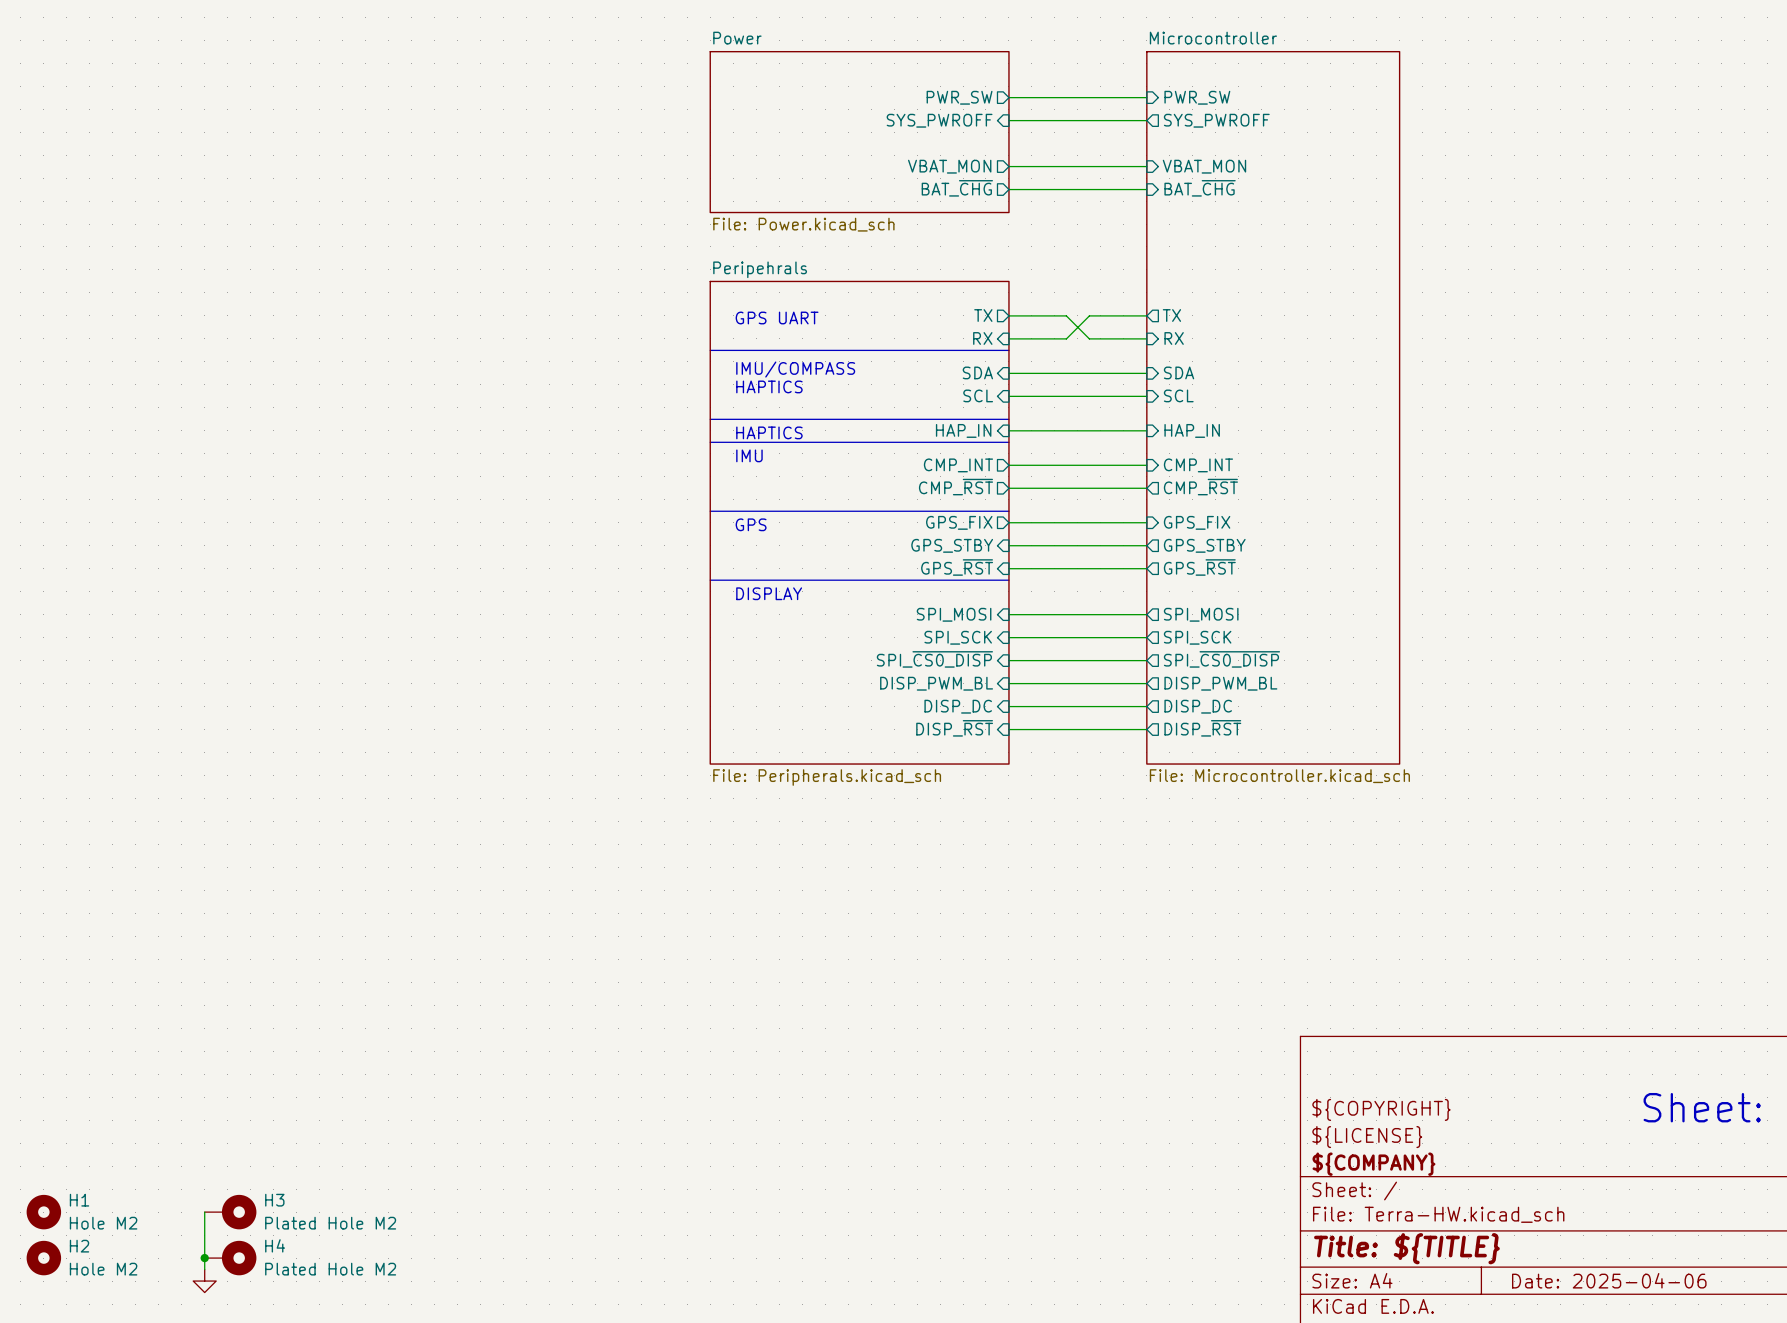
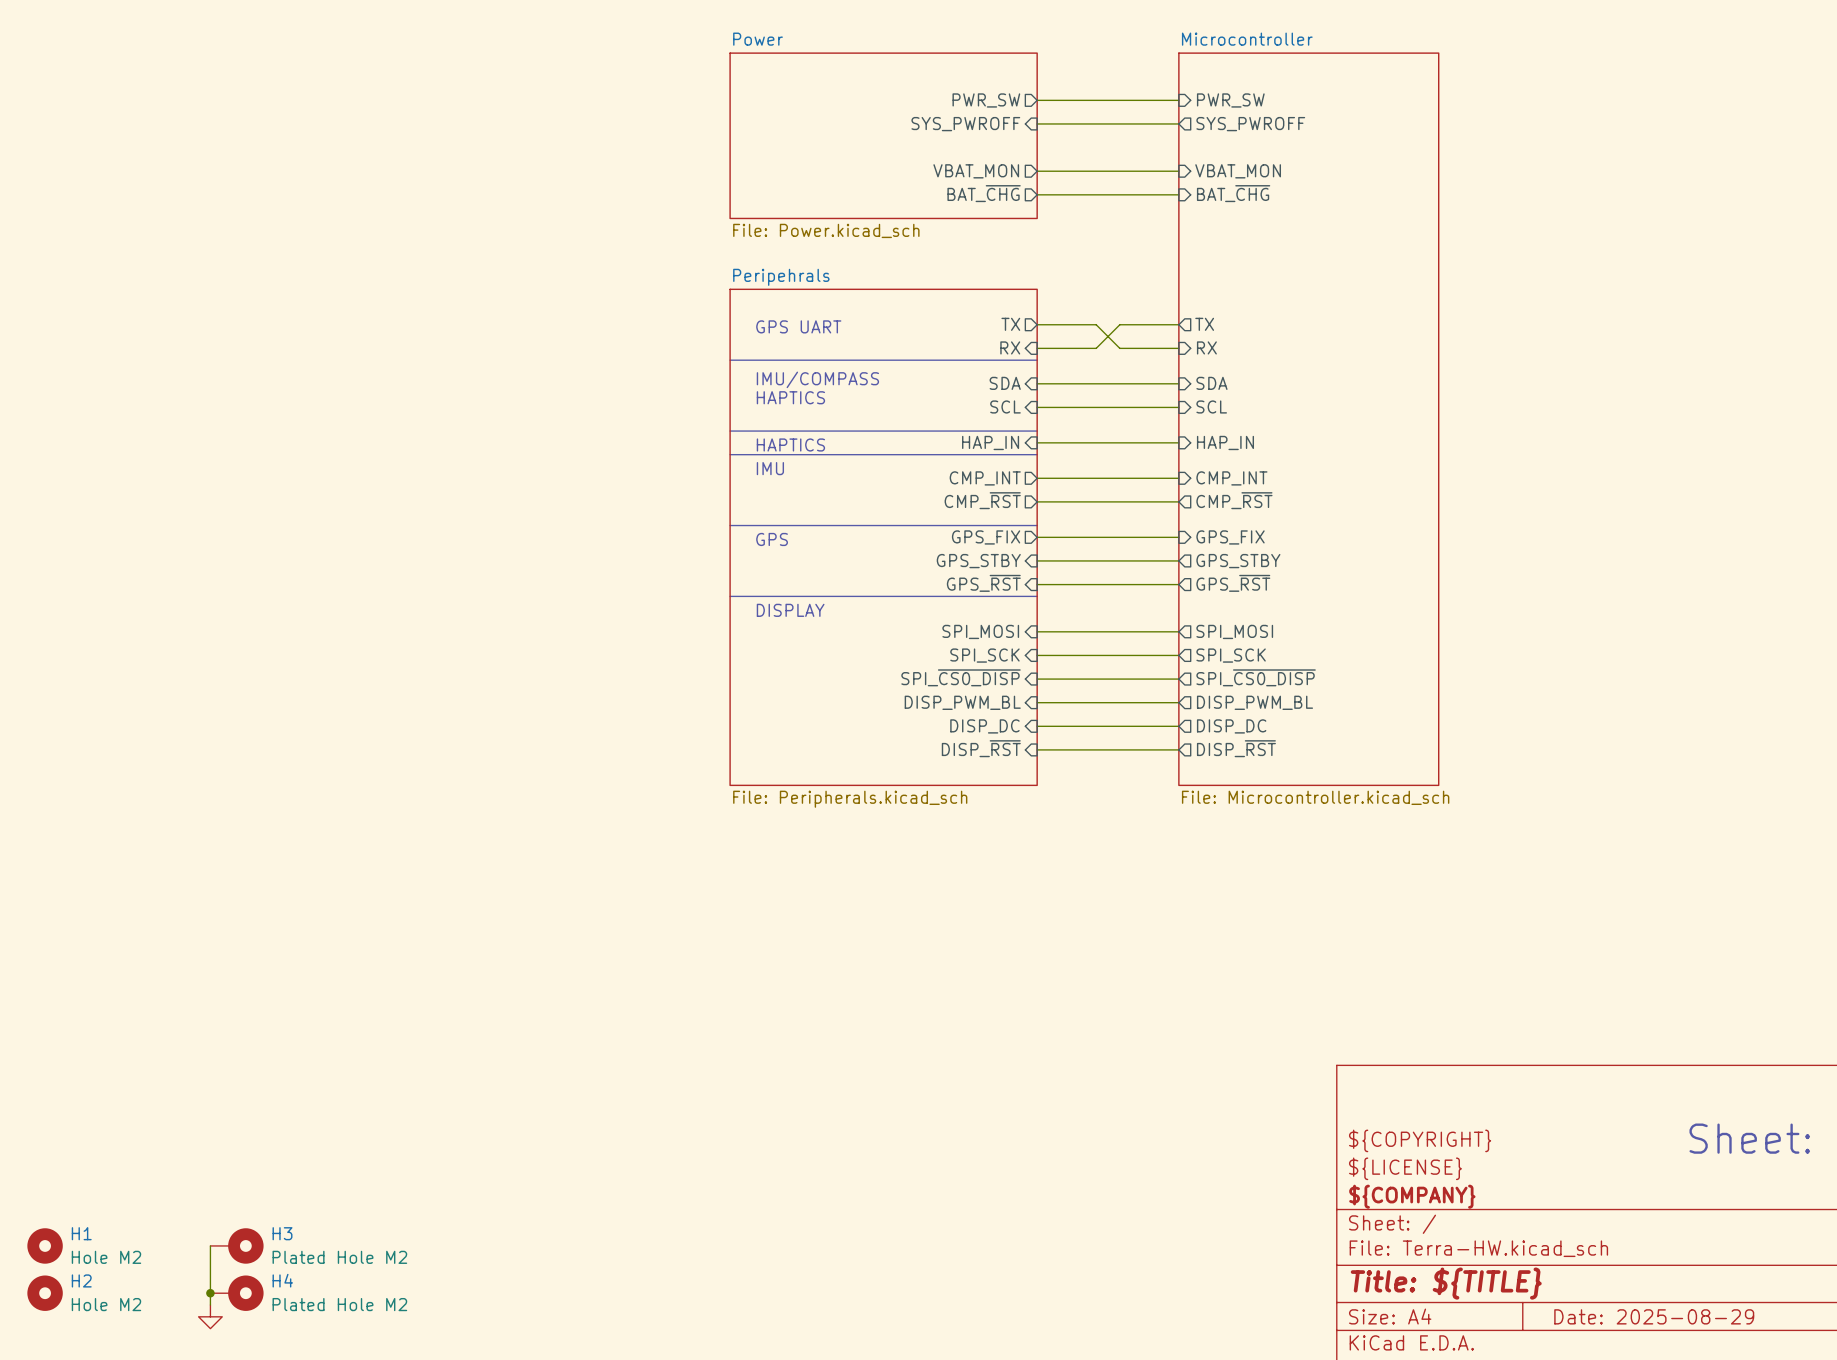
title block: Date: 2025-04-06 (1609, 1280) -> Date: 2025-08-29 (1654, 1316)

